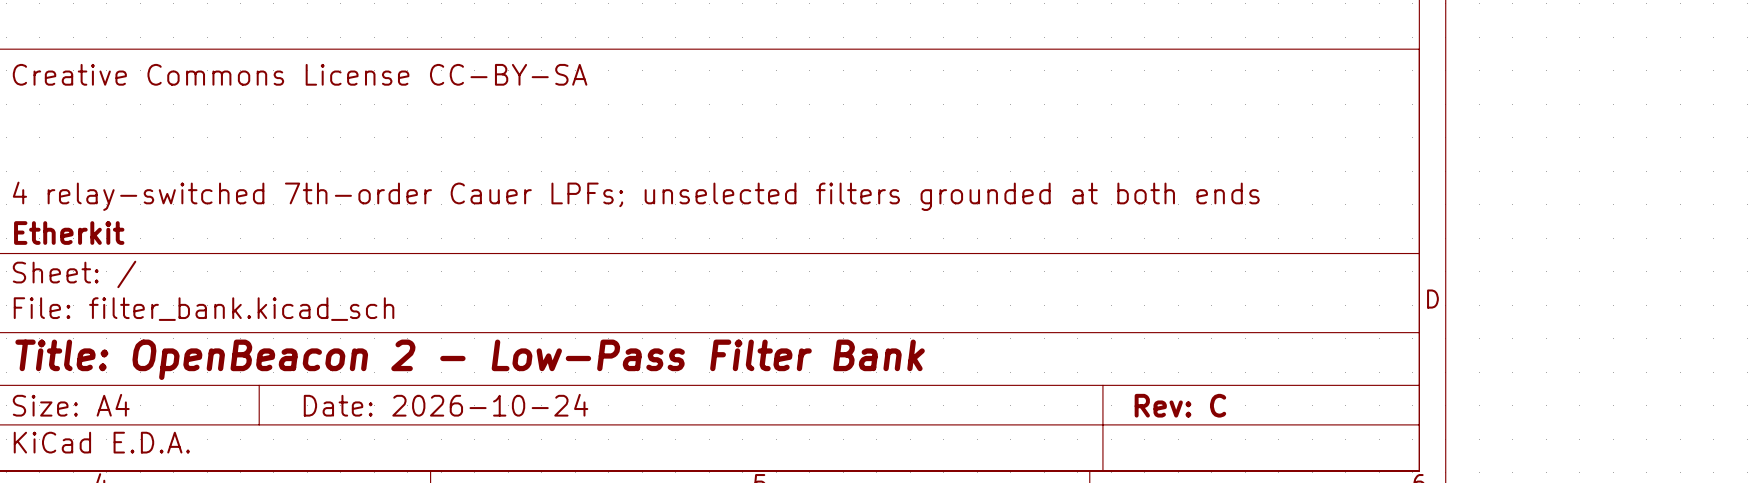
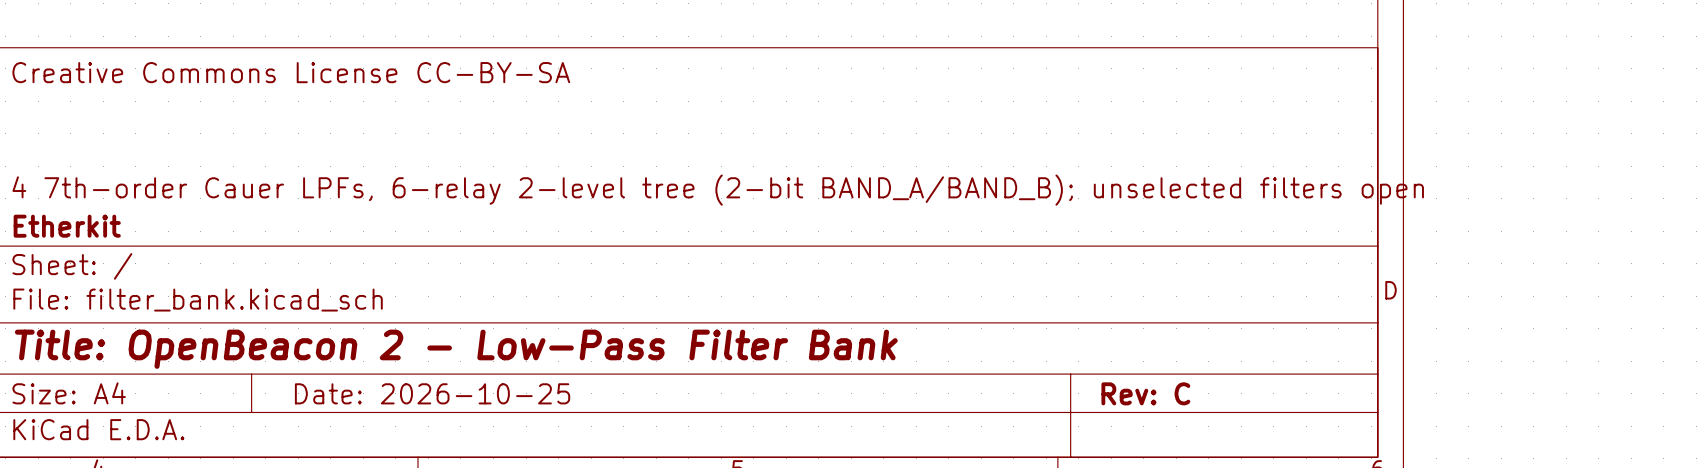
title block: 4 relay-switched 7th-order Cauer LPFs; unselected filters grounded at both ends (636, 196) -> 4 7th-order Cauer LPFs, 6-relay 2-level tree (2-bit BAND_A/BAND_B); unselected filters open (718, 190)
title block: Date: 2026-10-24 (446, 405) -> Date: 2026-10-25 (432, 393)

